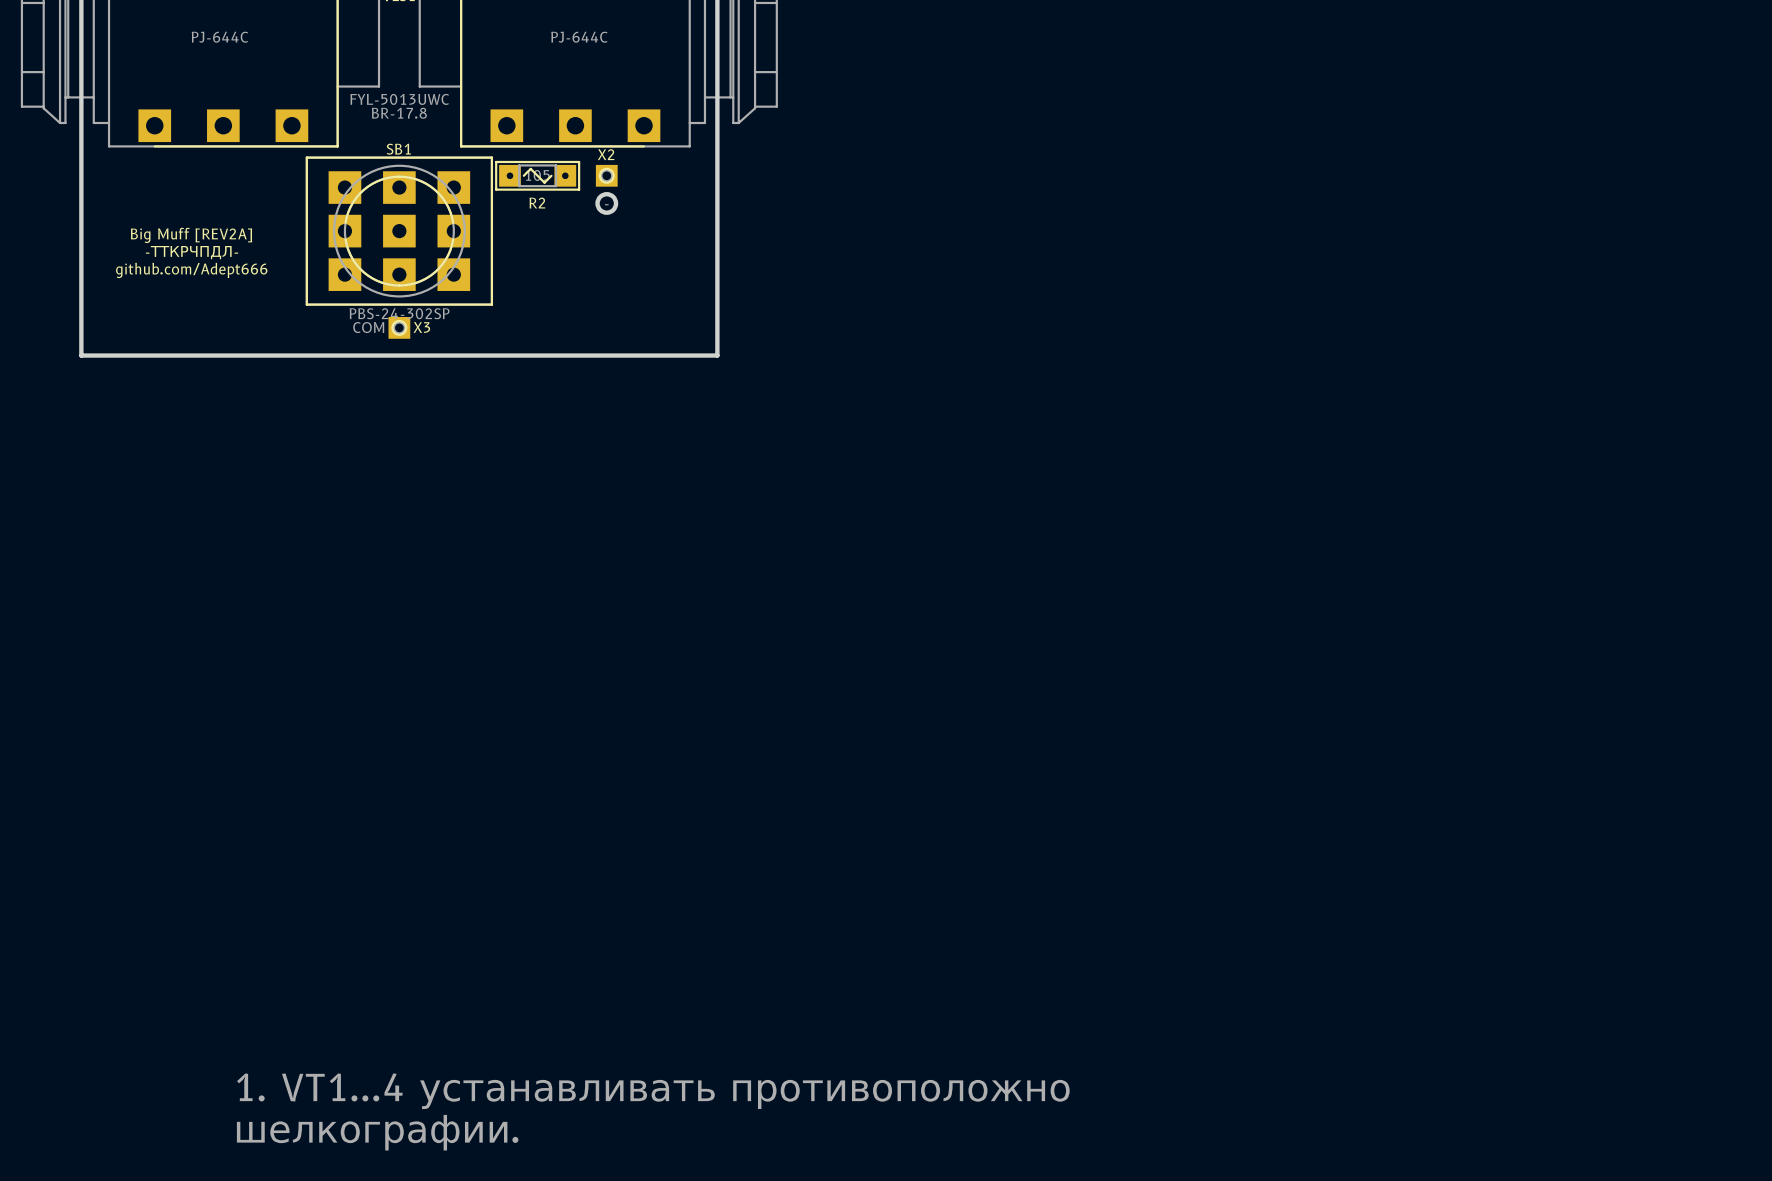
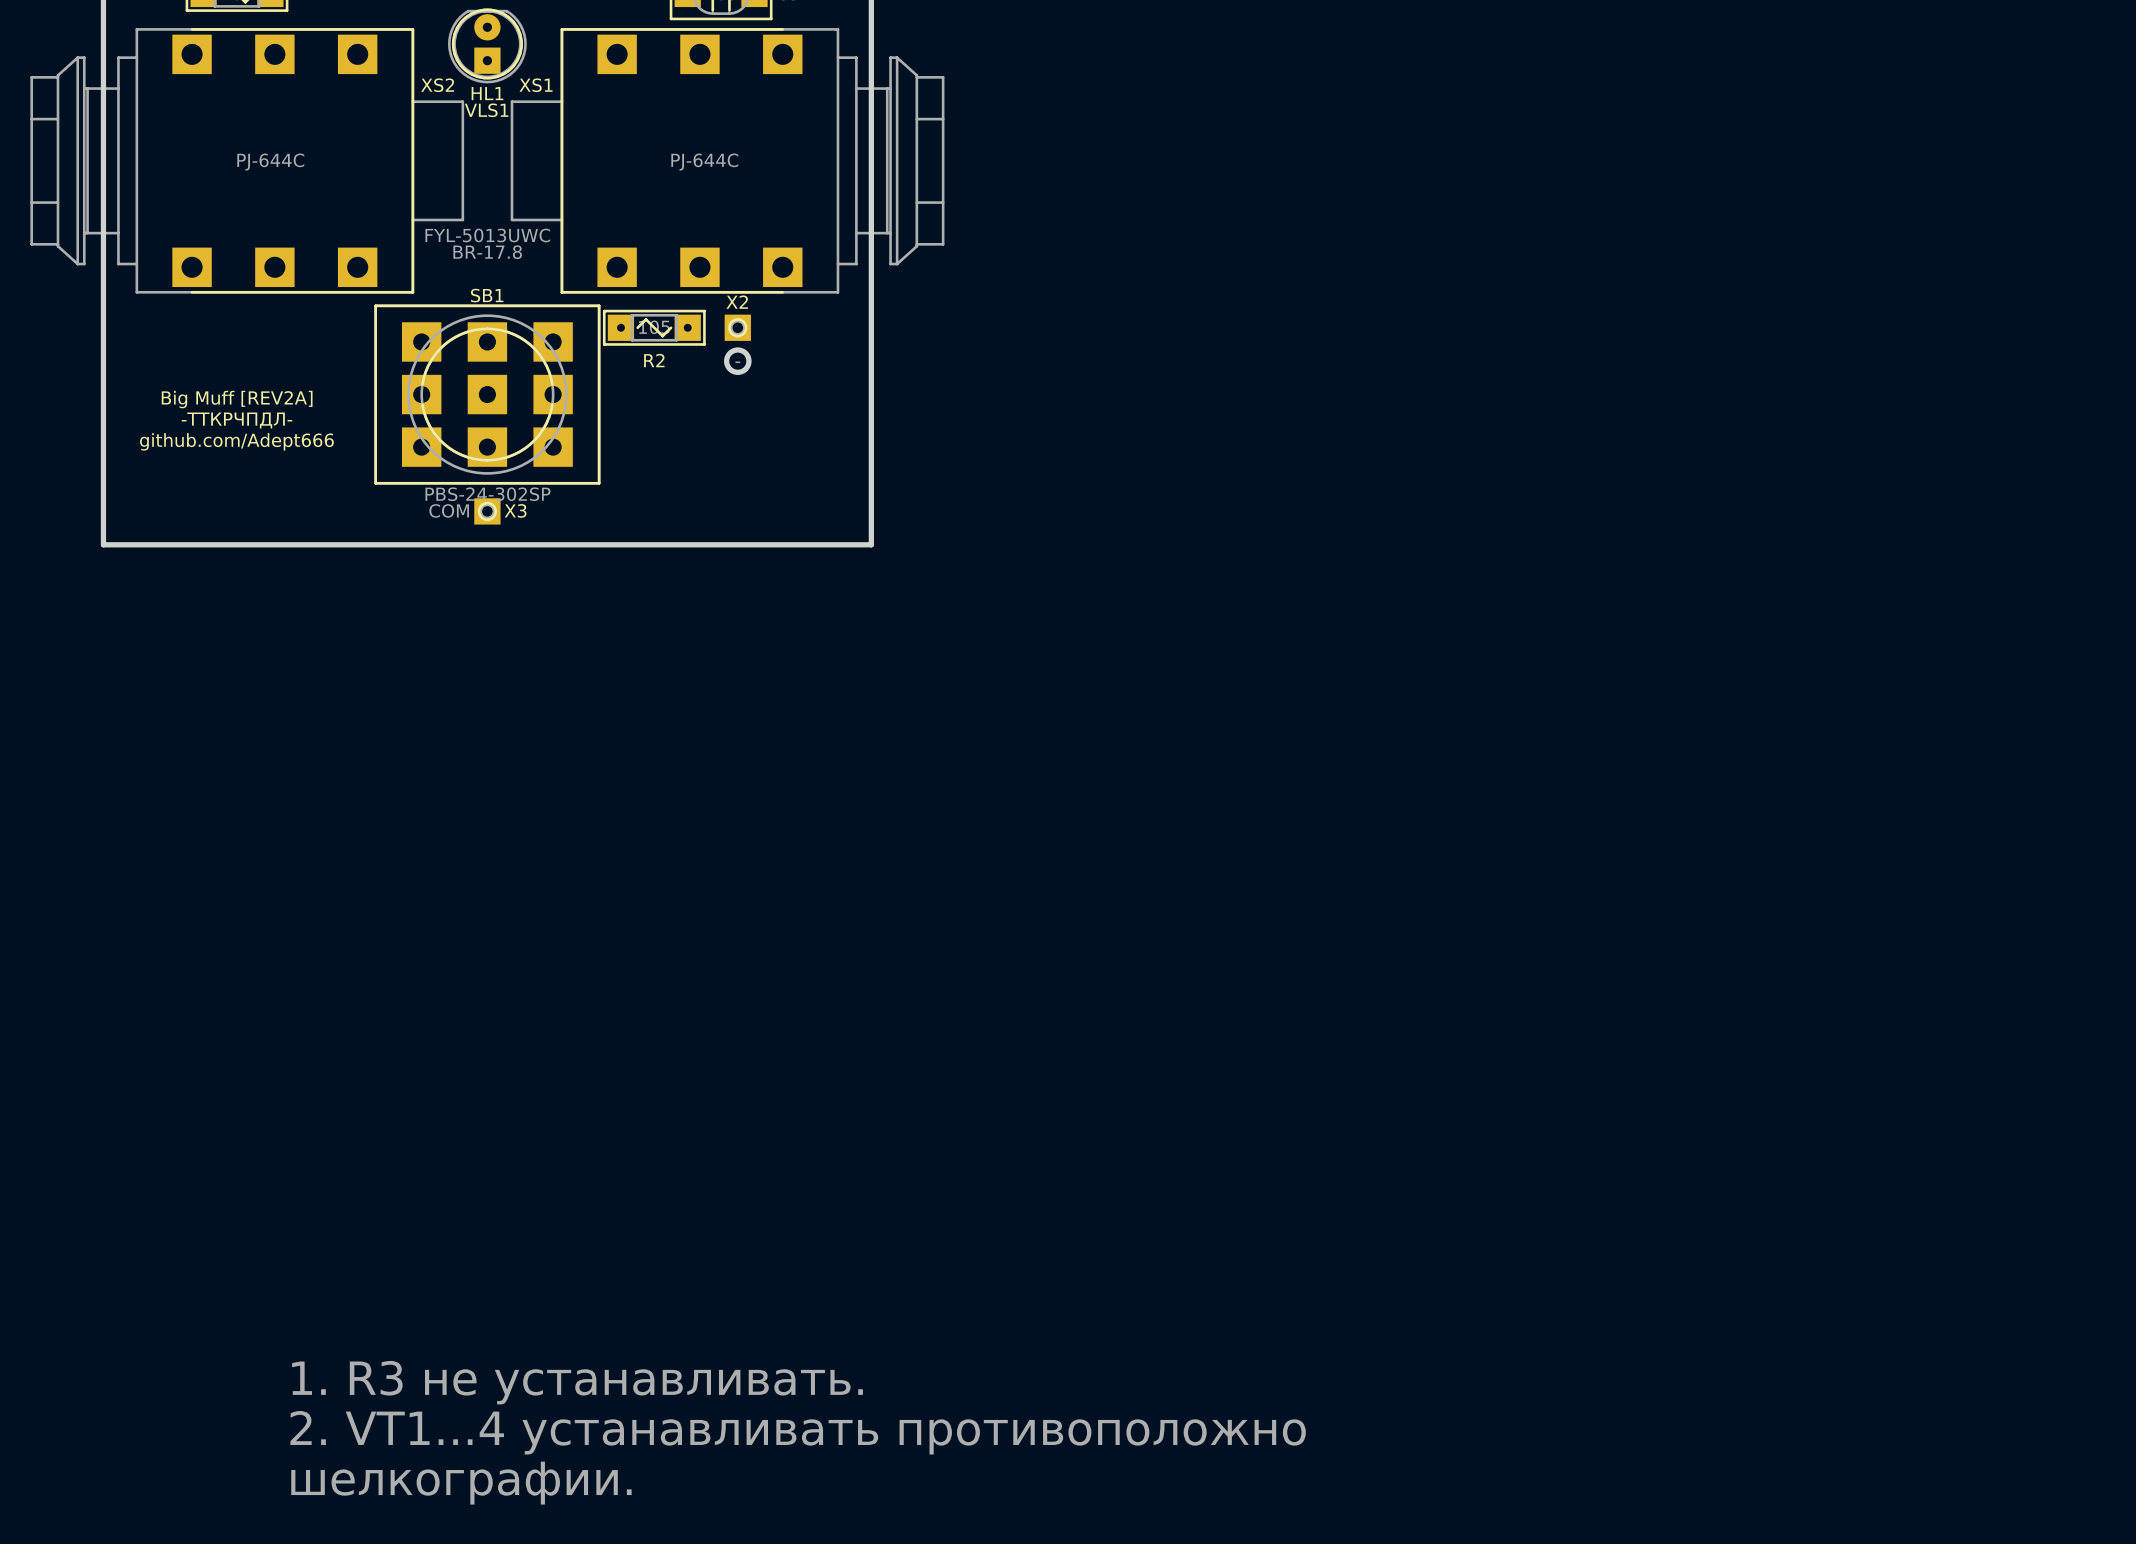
text: none -> 1. R3 не устанавливать. (577, 1382)
text: 1. VT1...4 устанавливать противоположно (653, 1091) -> 2. VT1...4 устанавливать противоположно (798, 1432)

